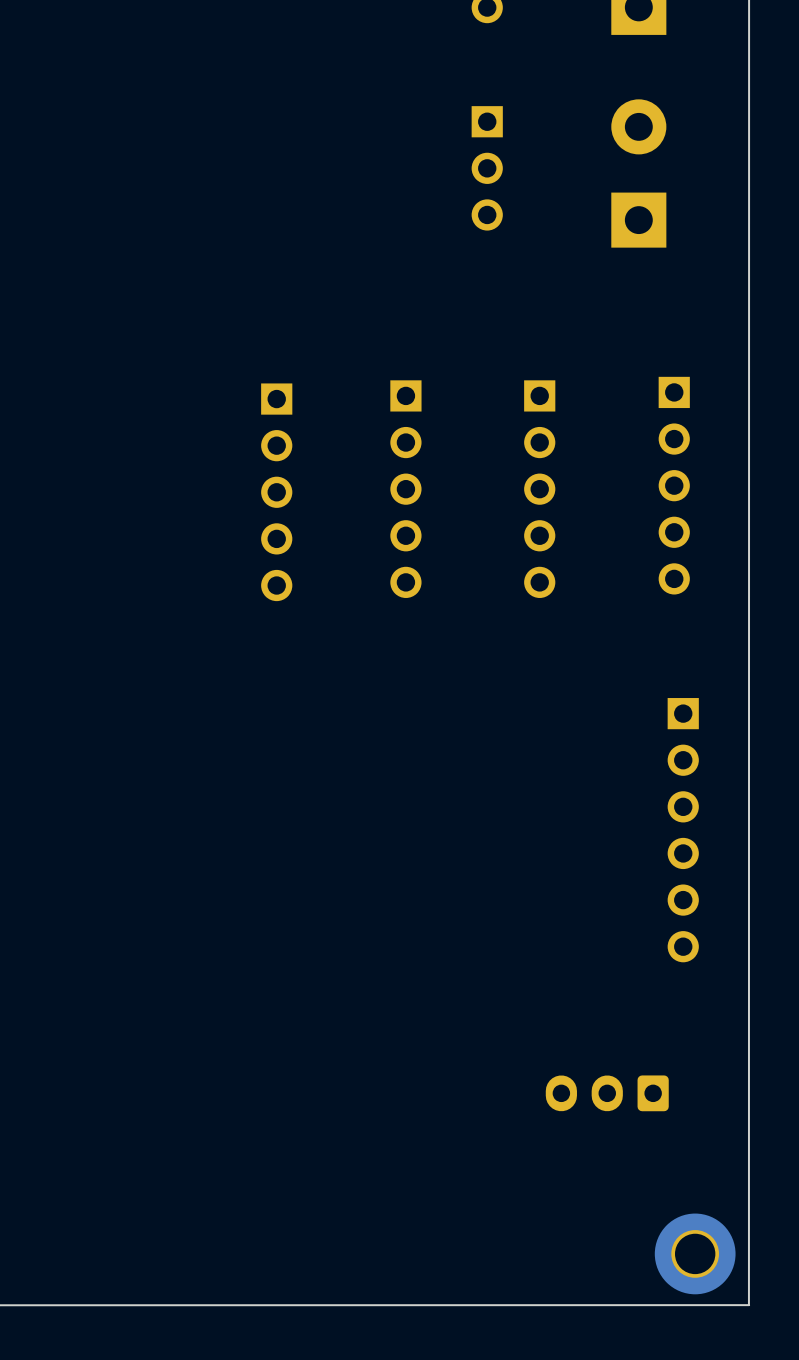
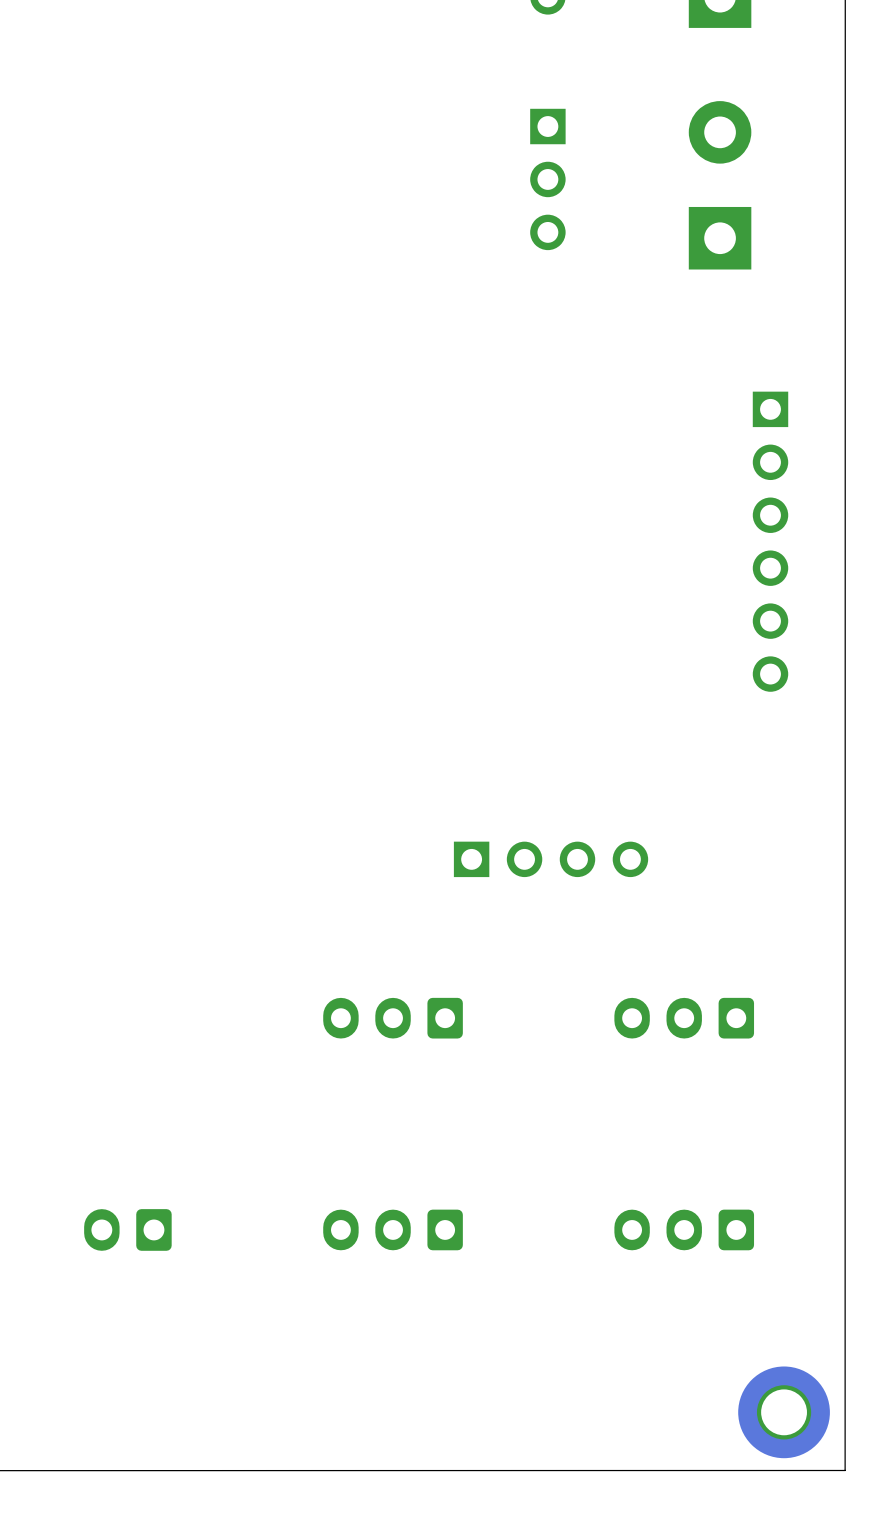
part footprint: [658, 376, 690, 595] -> [752, 391, 789, 692]
part: (405, 489) -> none
part: (539, 489) -> none
part: (276, 492) -> none
part: none -> (551, 859)
part: (683, 830) -> none
part: none -> (393, 1018)
part: none -> (684, 1018)
part: none -> (127, 1229)
part: none -> (393, 1229)

